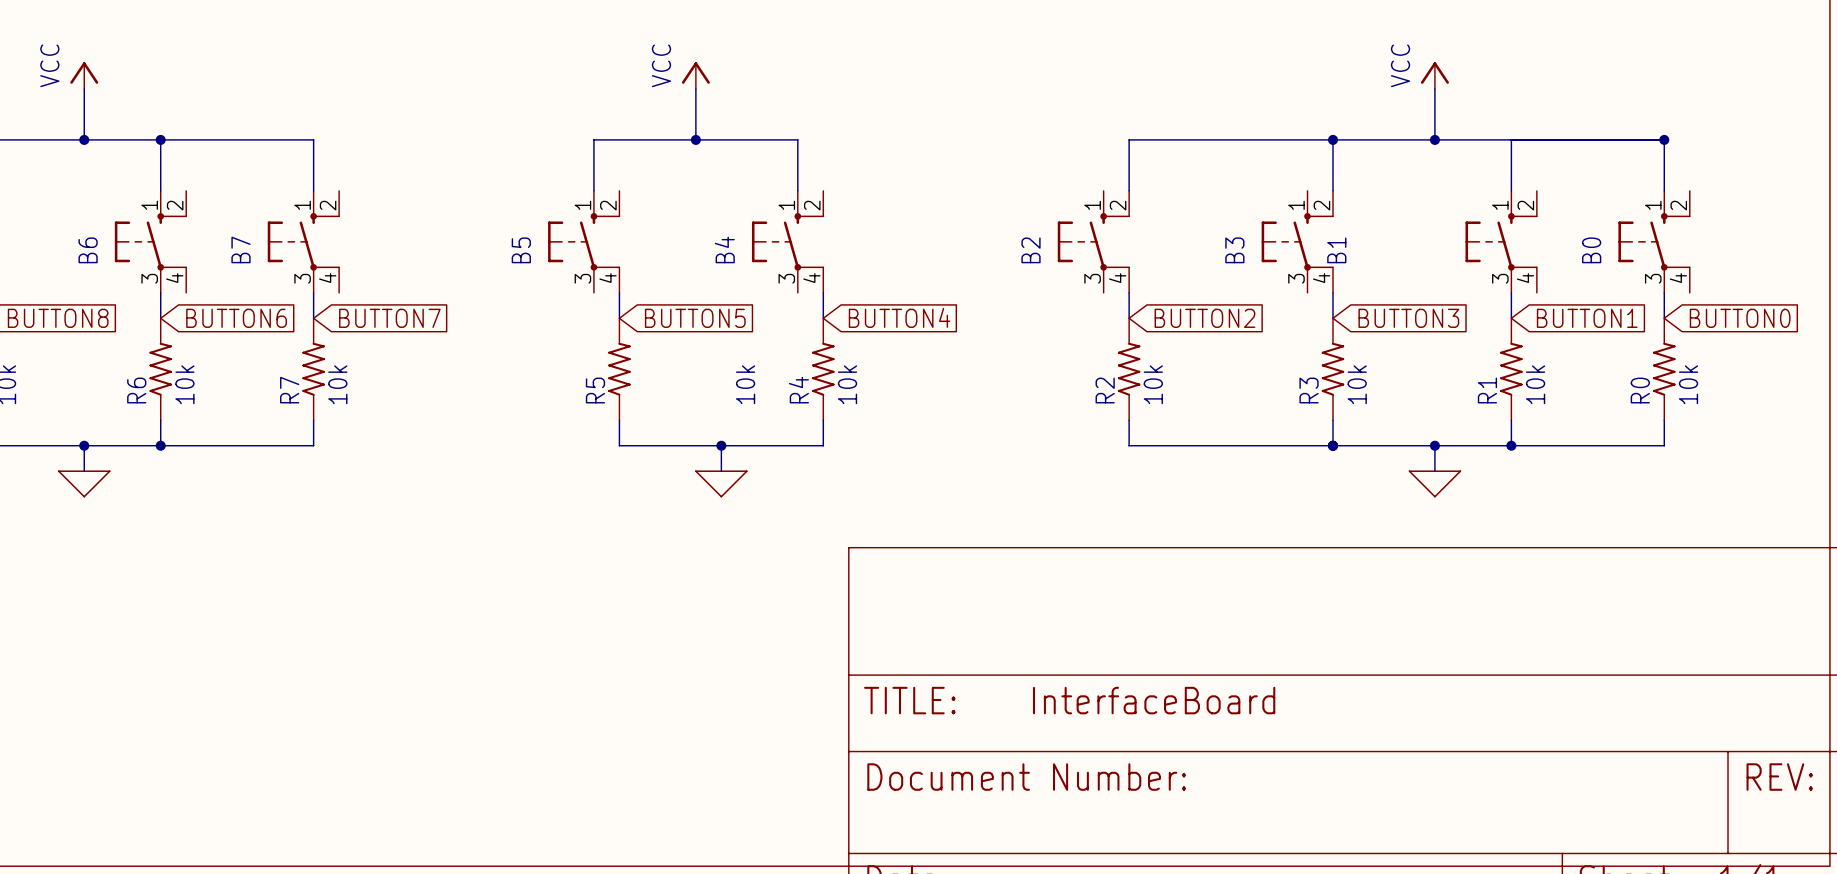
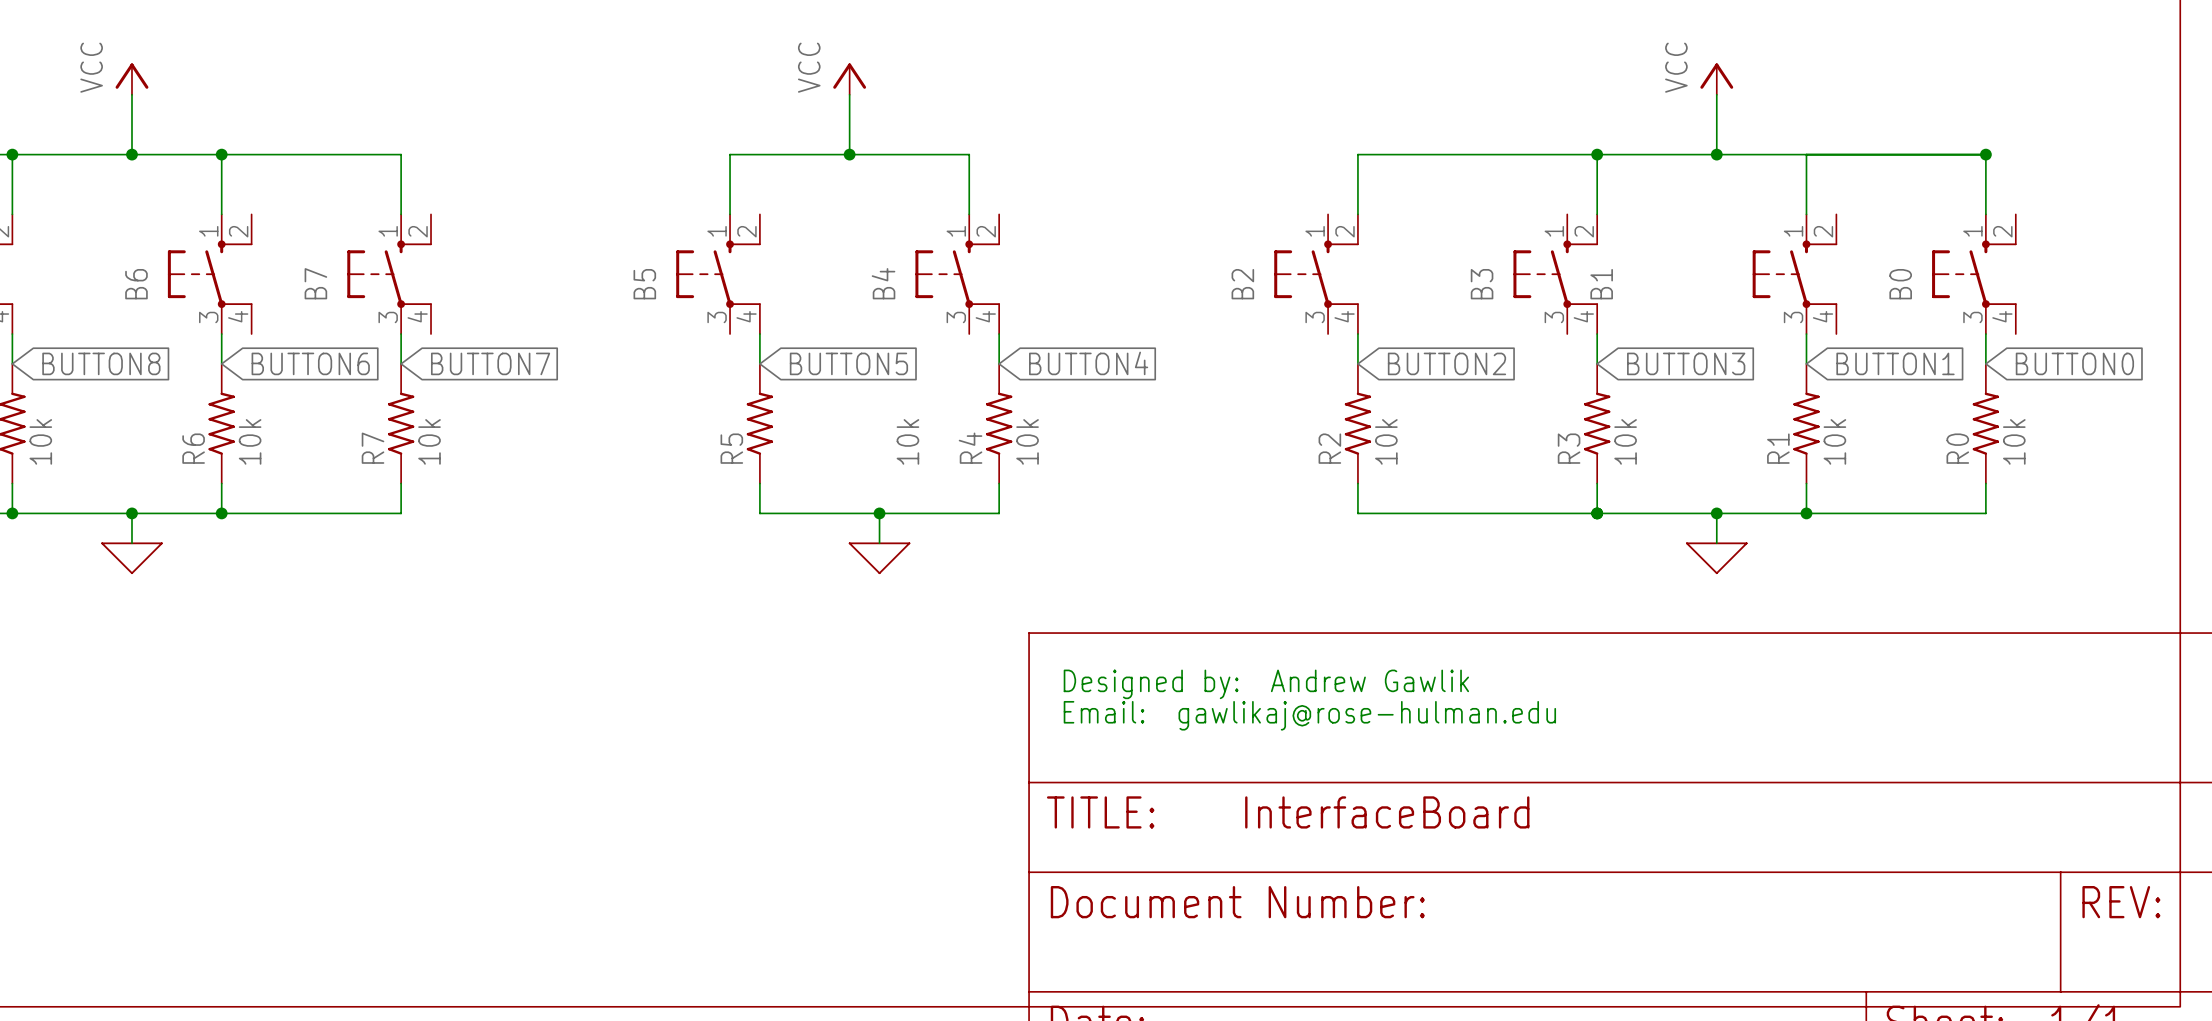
text: none -> Designed by: Andrew Gawlik (1266, 684)
text: none -> Email: gawlikaj@rose-hulman.edu (1309, 715)

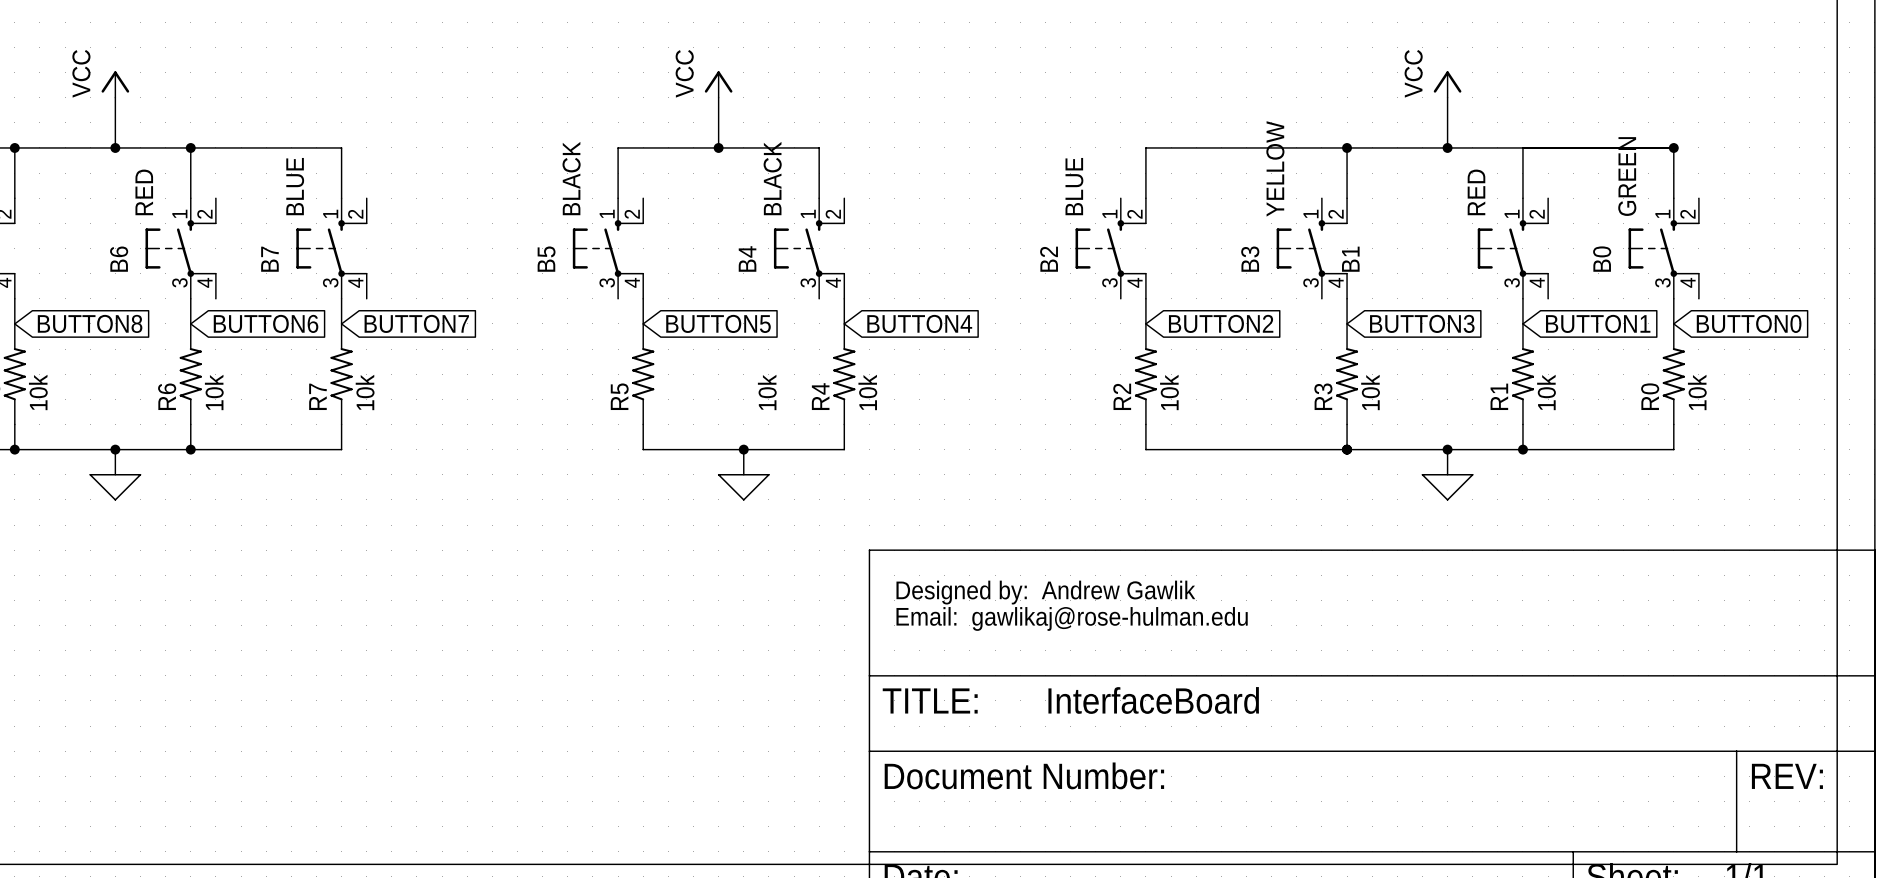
B3 value: none -> YELLOW (1275, 168)
B0 value: none -> GREEN (1627, 176)
B5 value: none -> BLACK (571, 178)
B4 value: none -> BLACK (772, 178)
B7 value: none -> BLUE (295, 186)
B2 value: none -> BLUE (1074, 186)
B6 value: none -> RED (144, 192)
B1 value: none -> RED (1476, 192)

